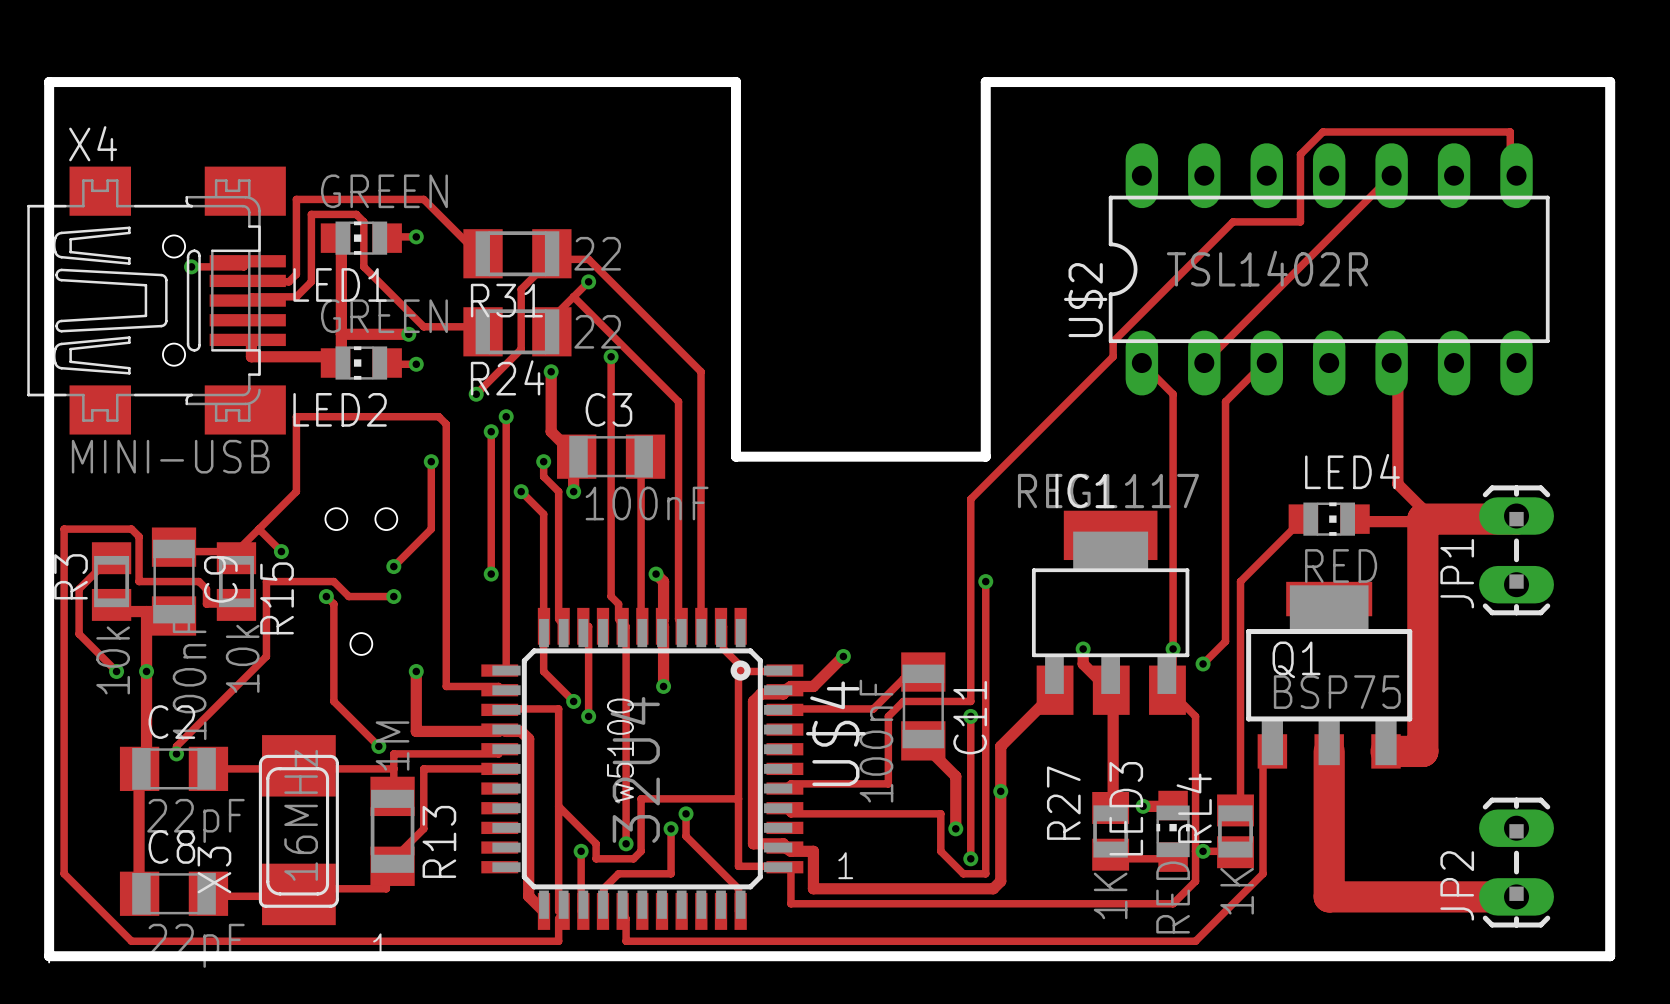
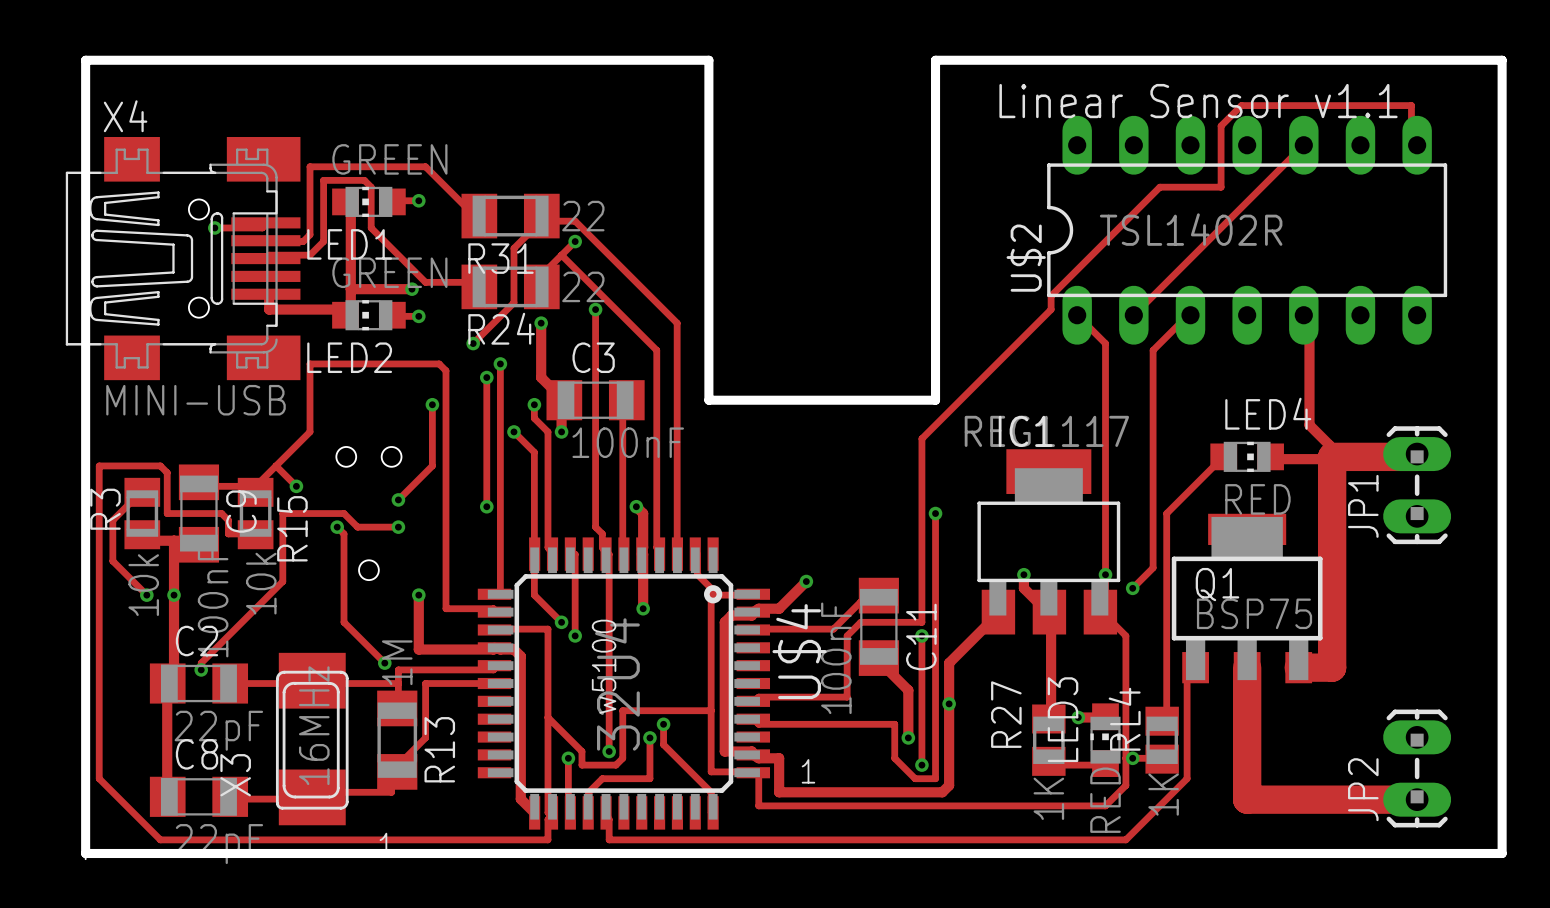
text: none -> Linear Sensor v1.1 (1198, 101)

